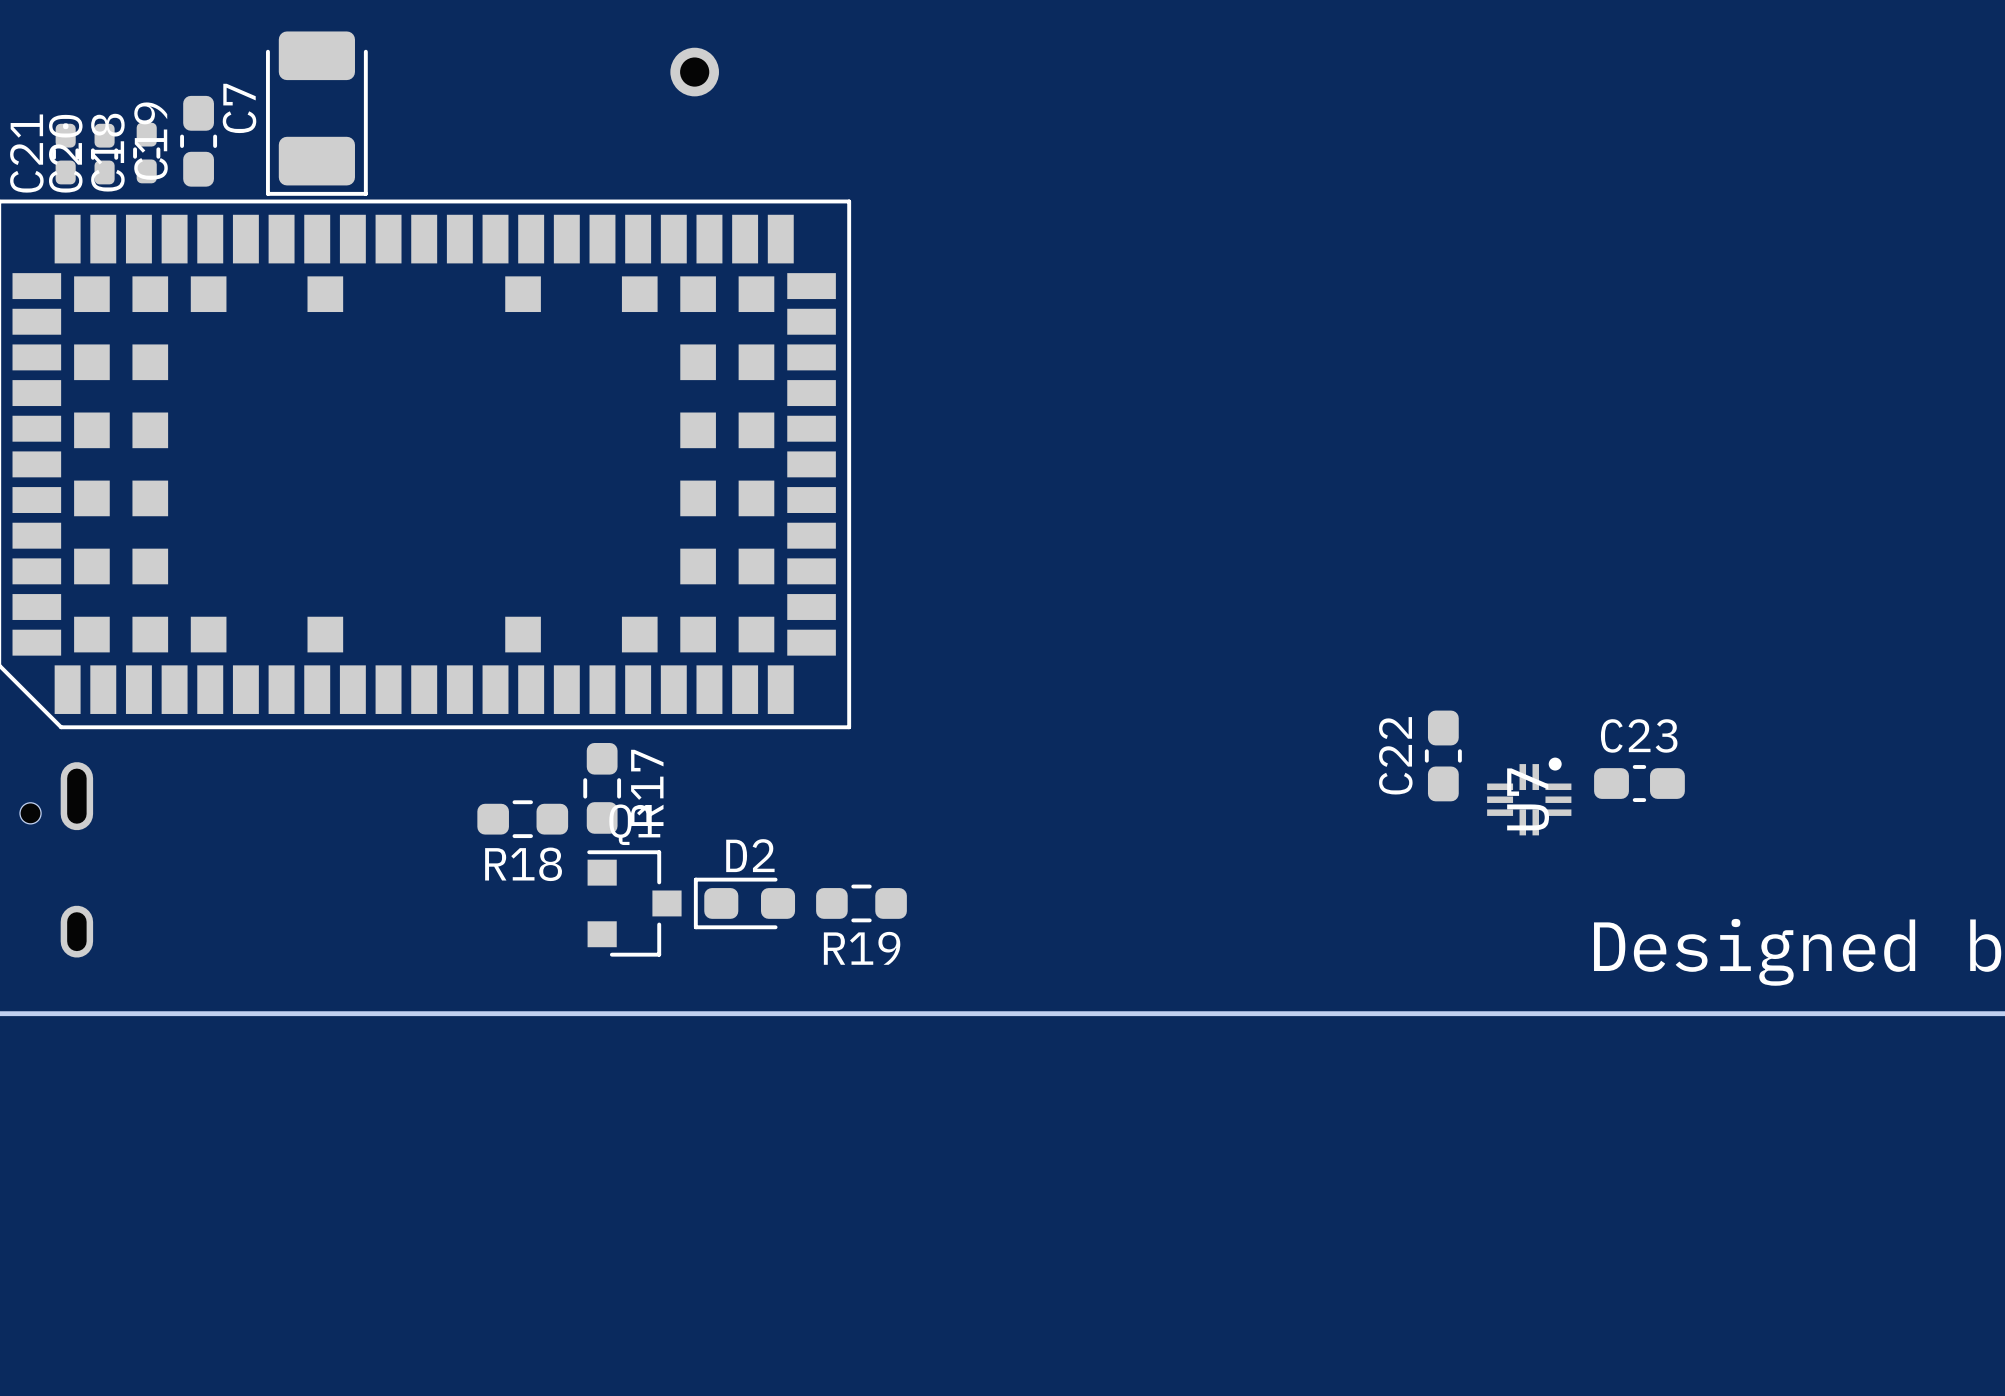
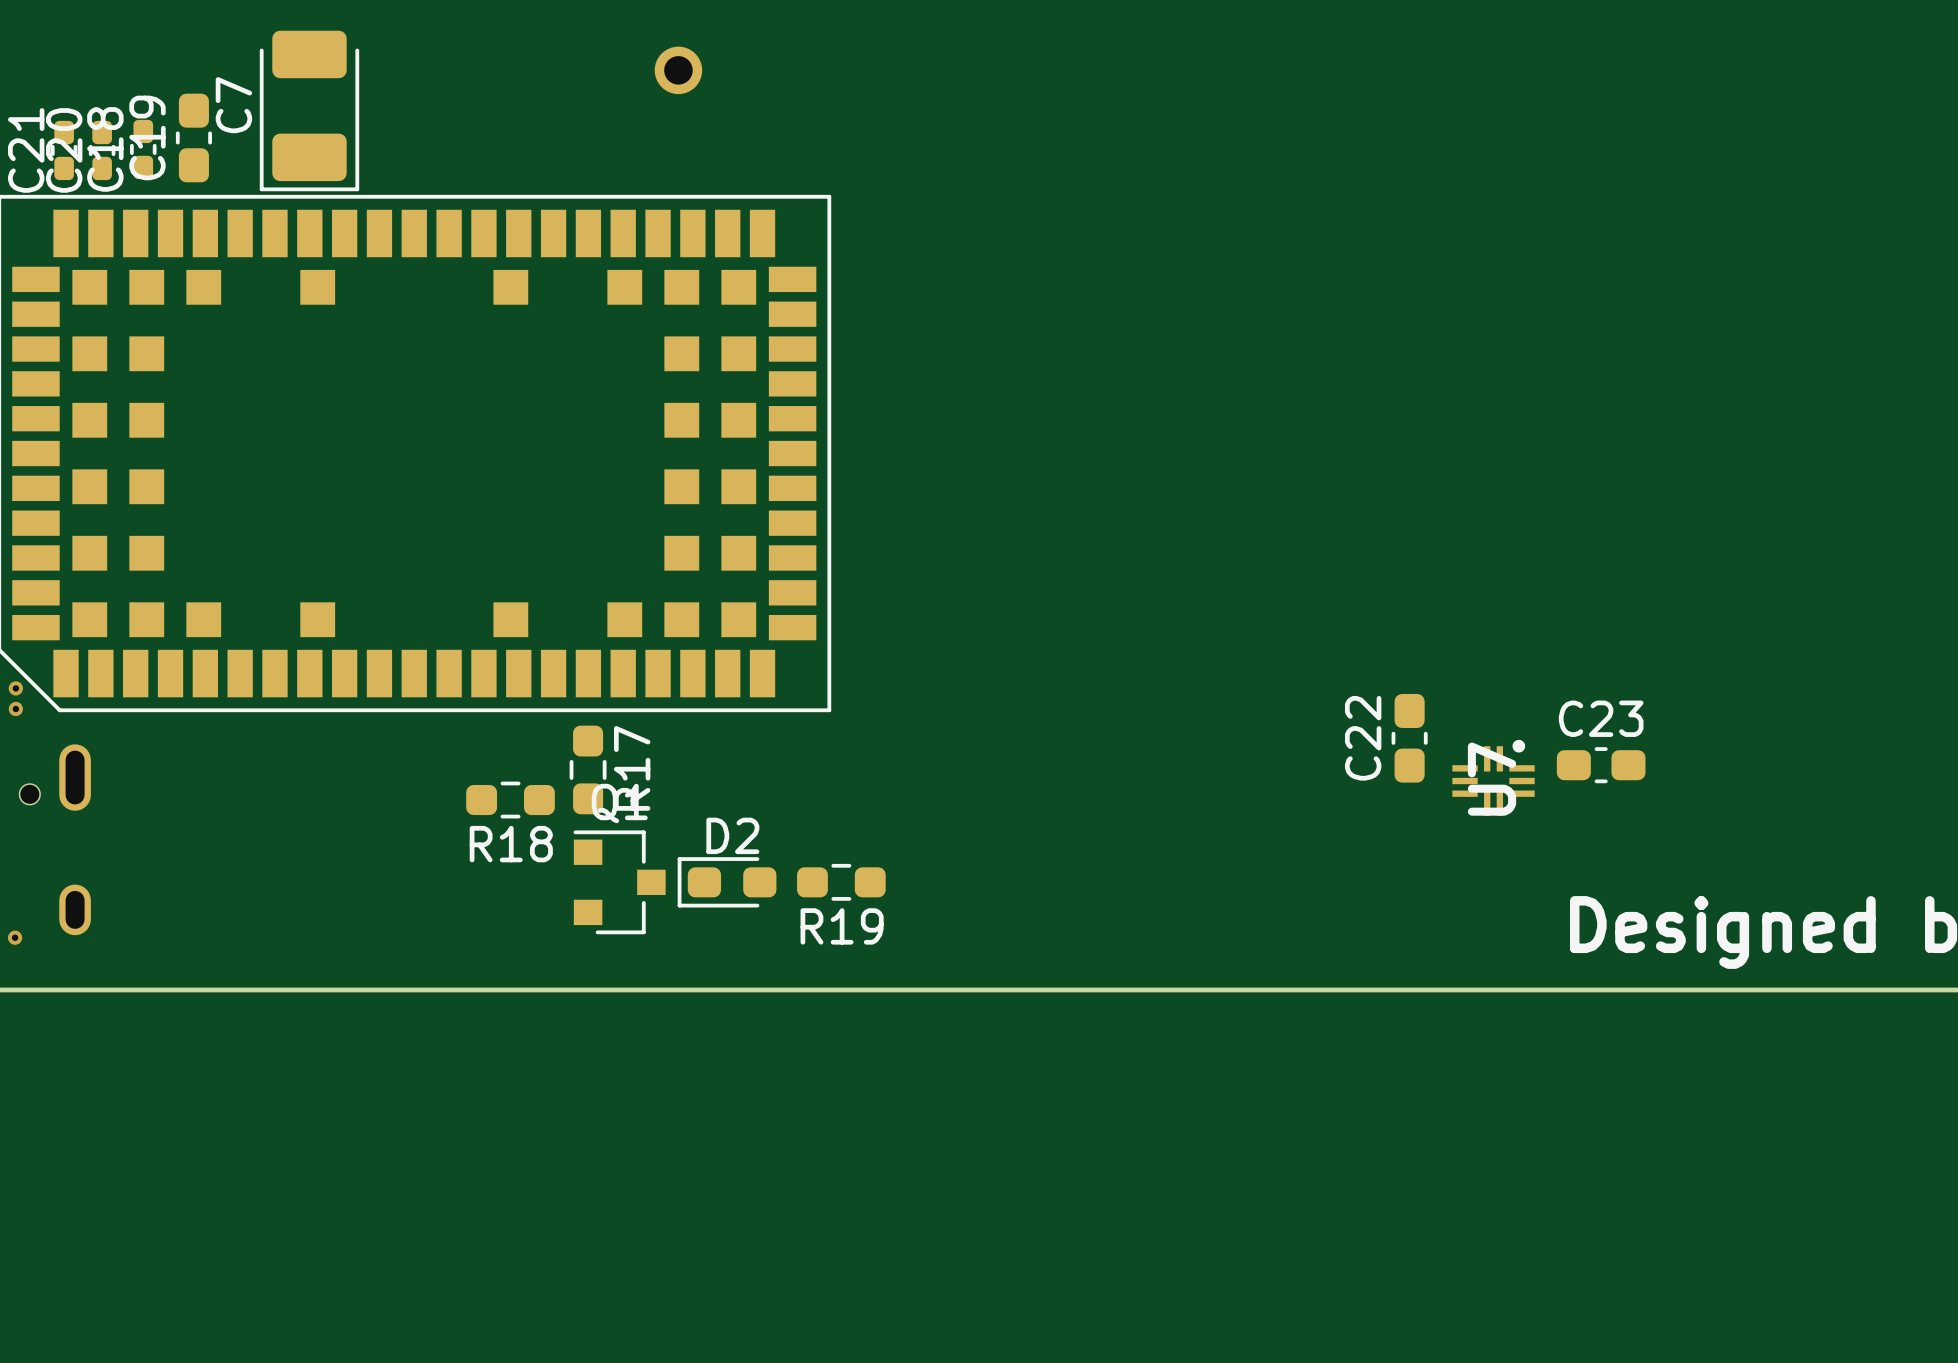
via: none -> (15, 688)
via: none -> (15, 709)
via: none -> (15, 937)

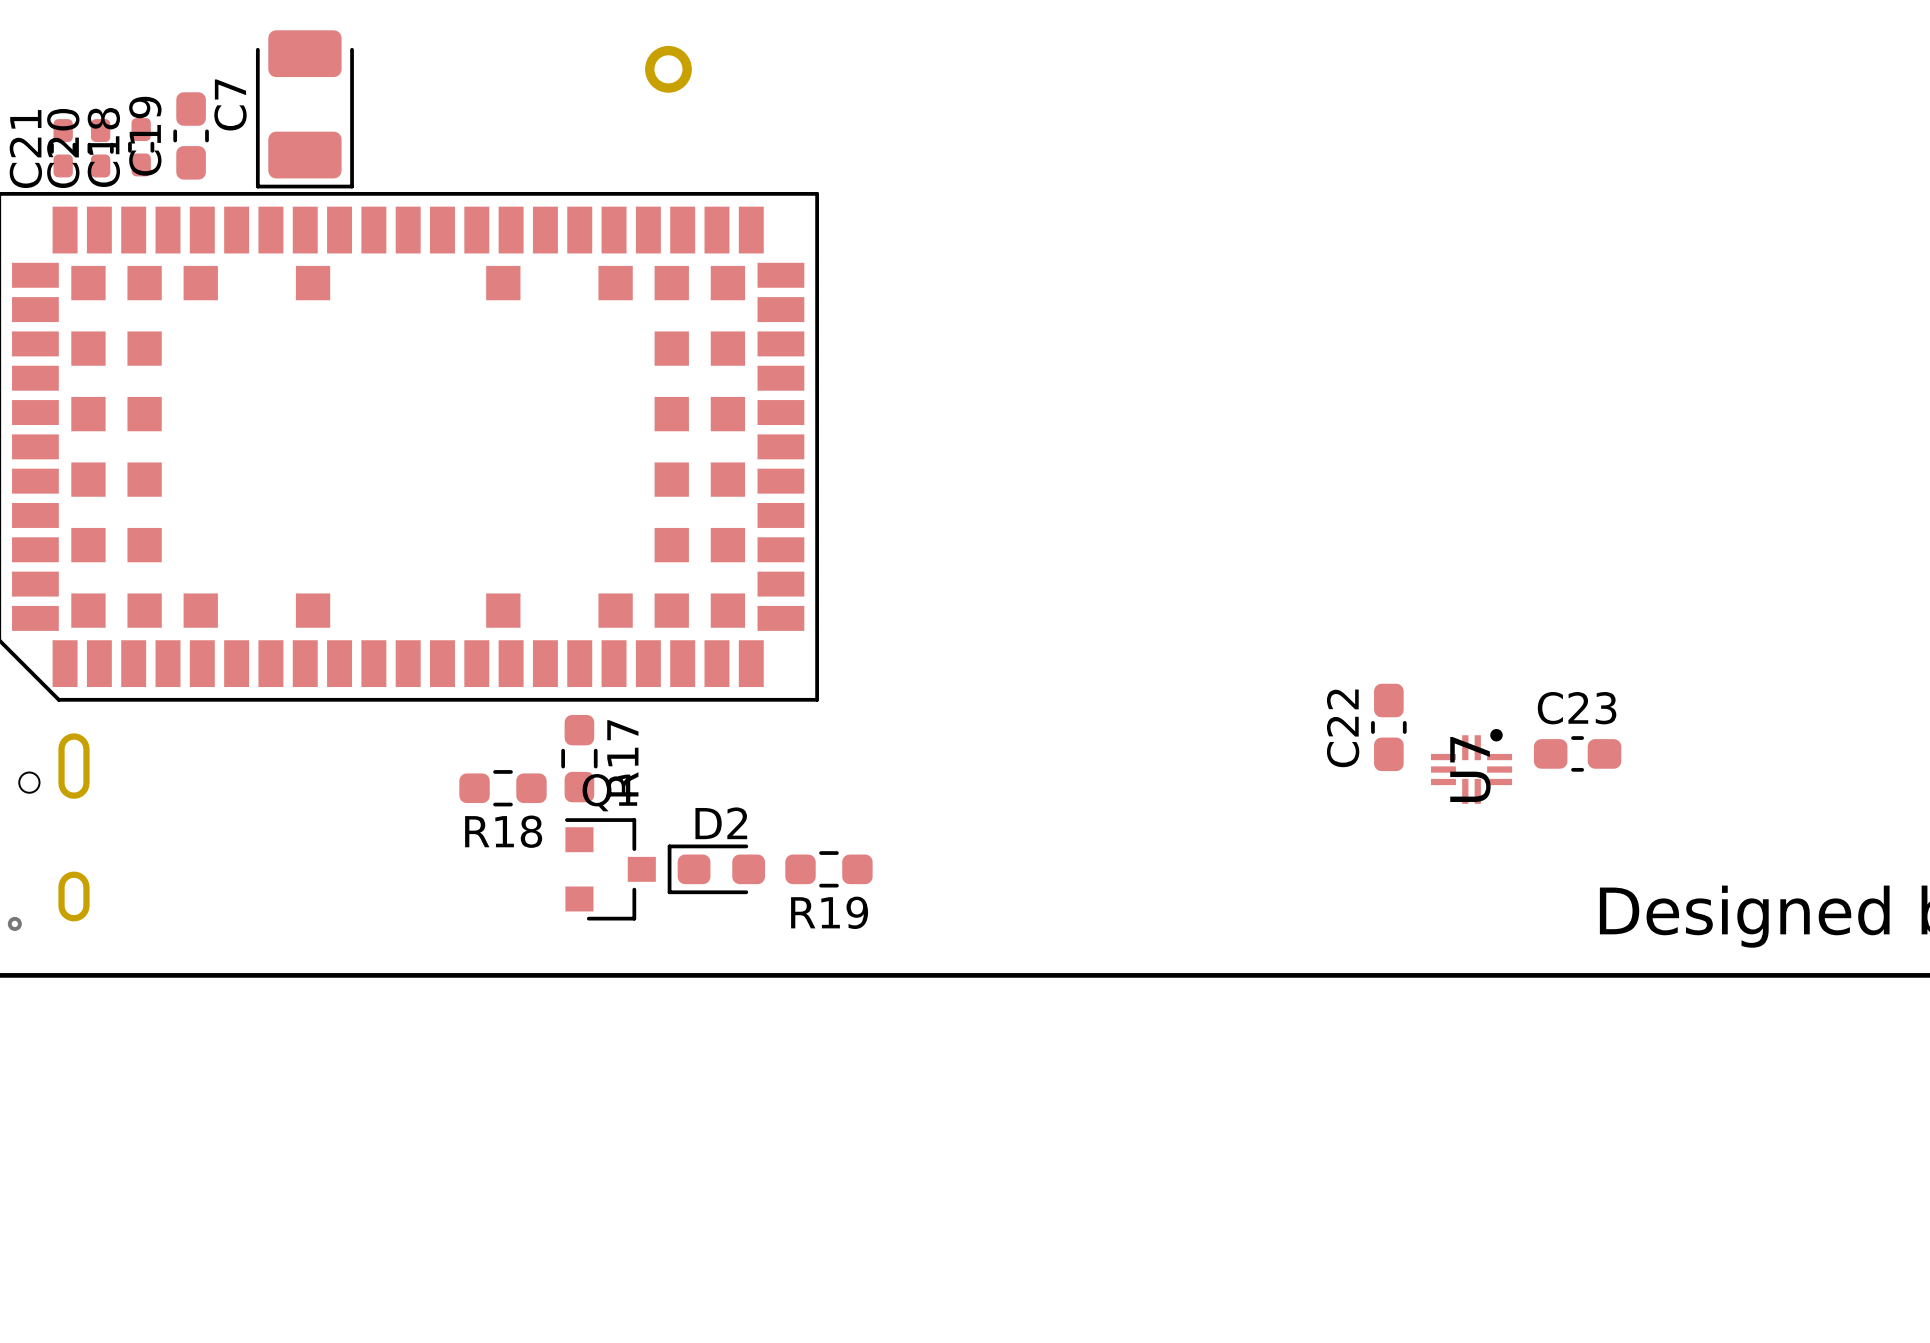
via: (15, 688) -> none
via: (15, 709) -> none

